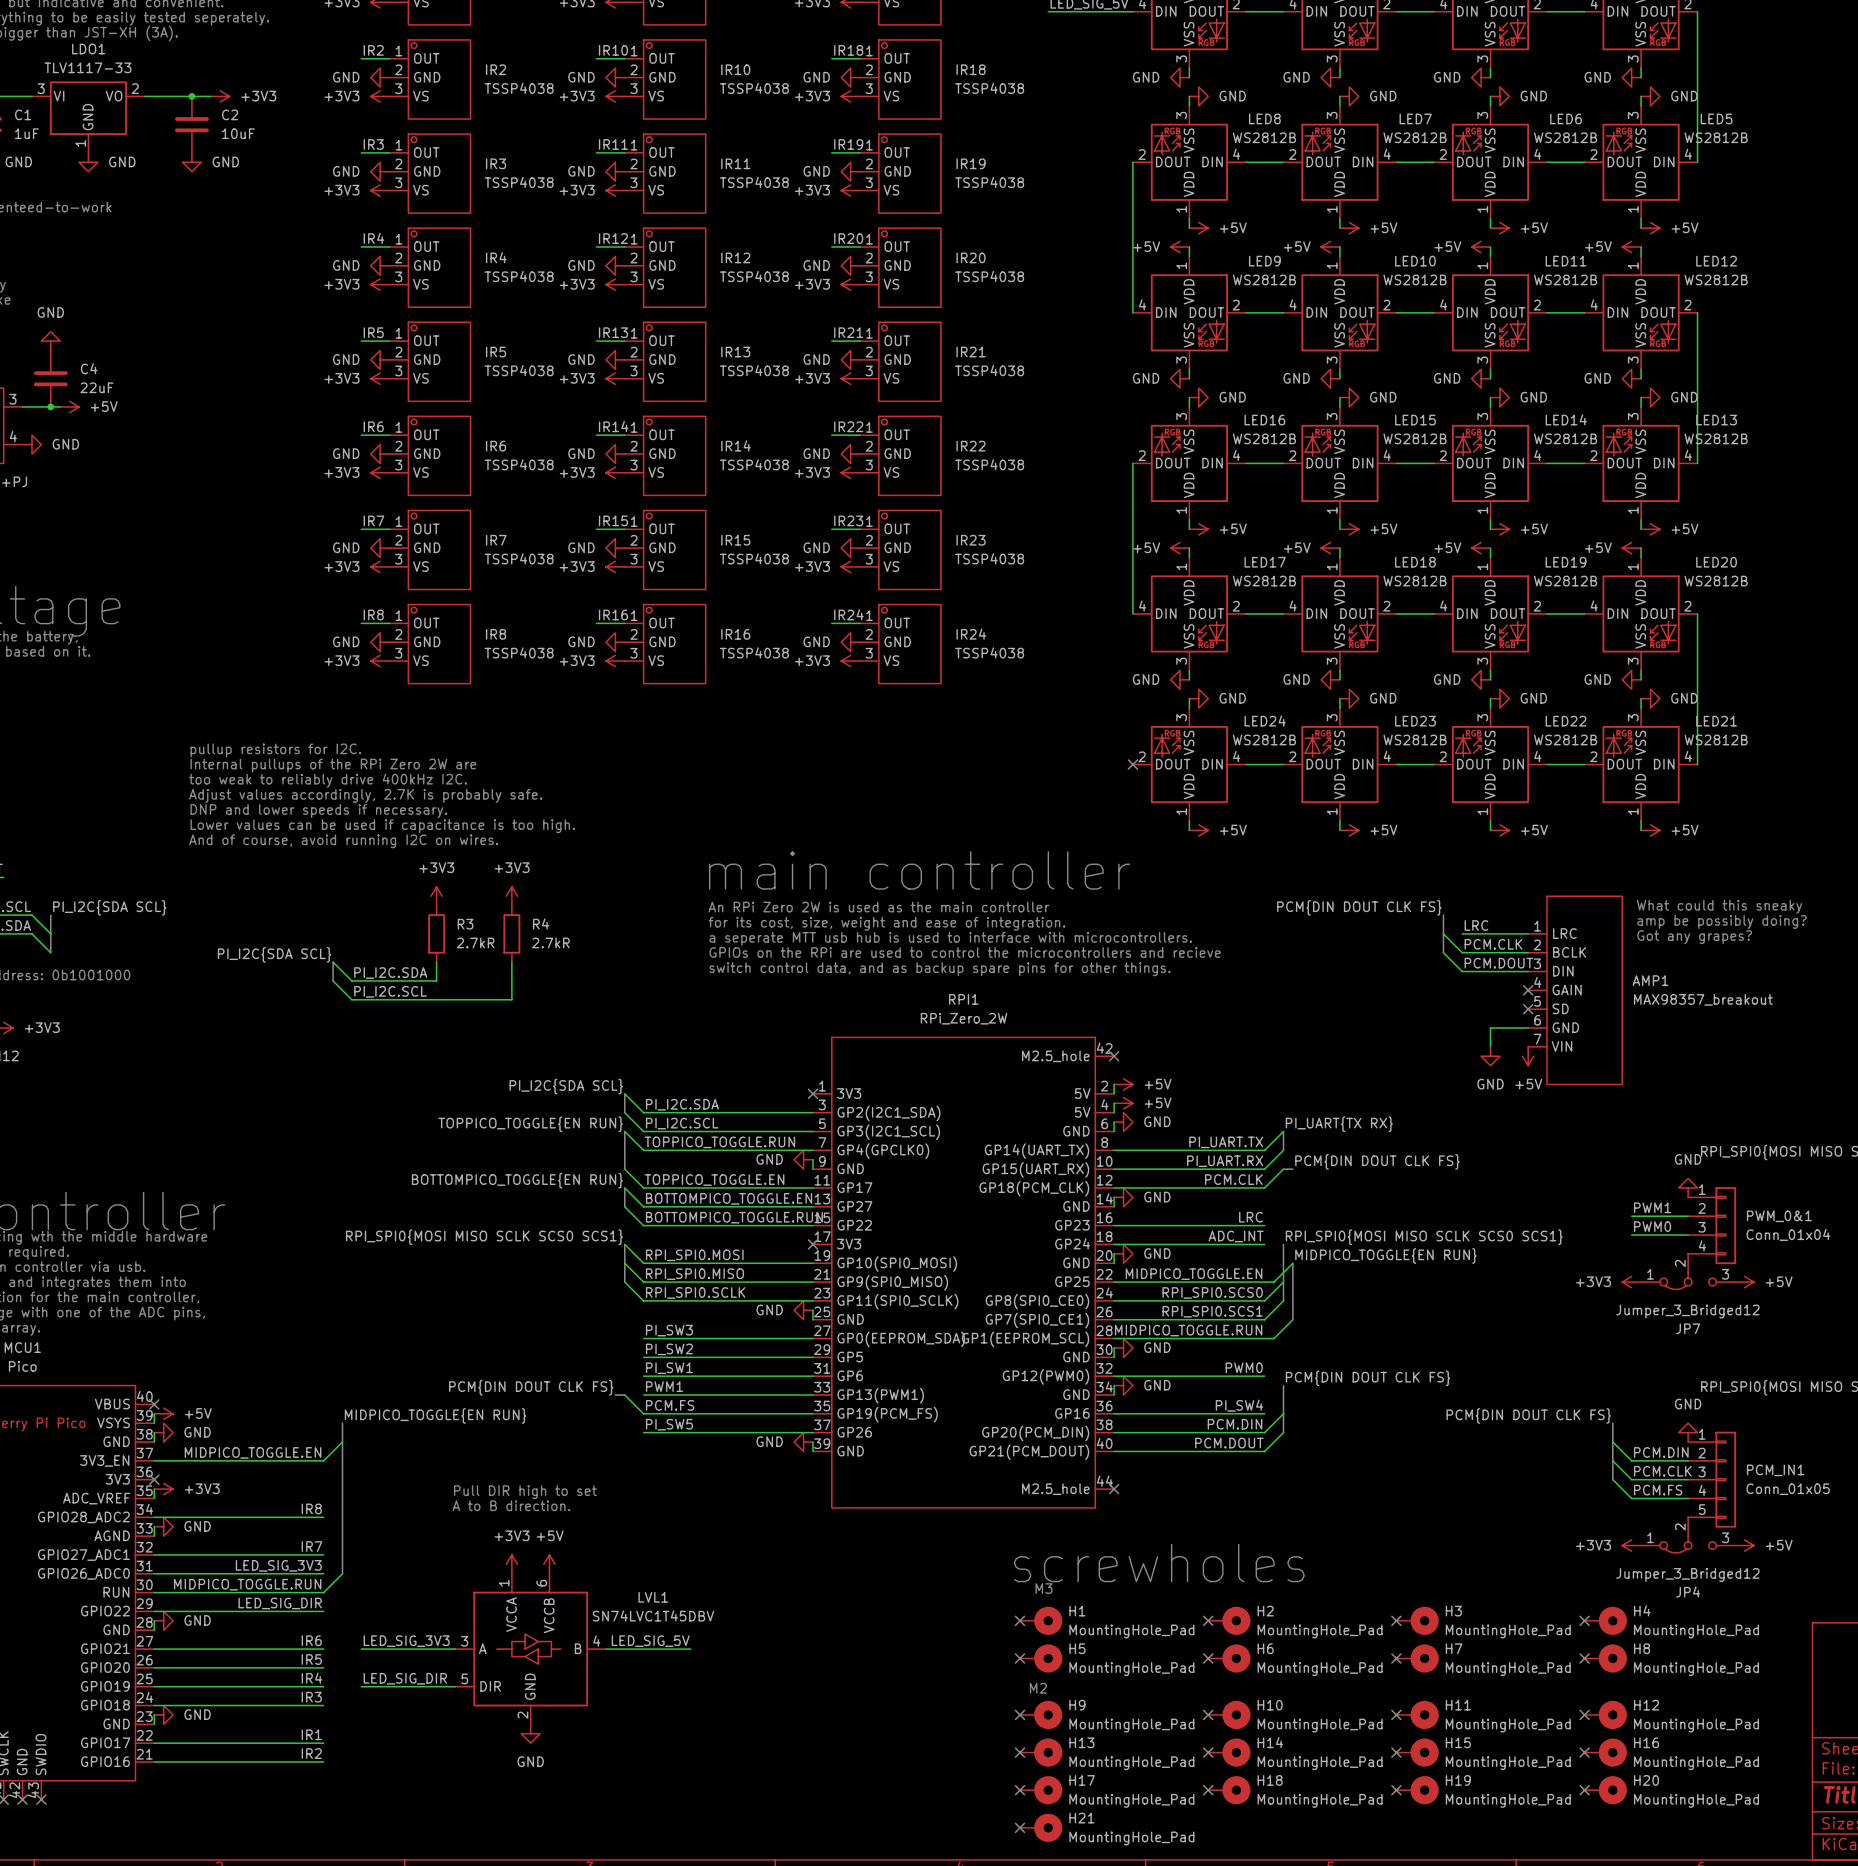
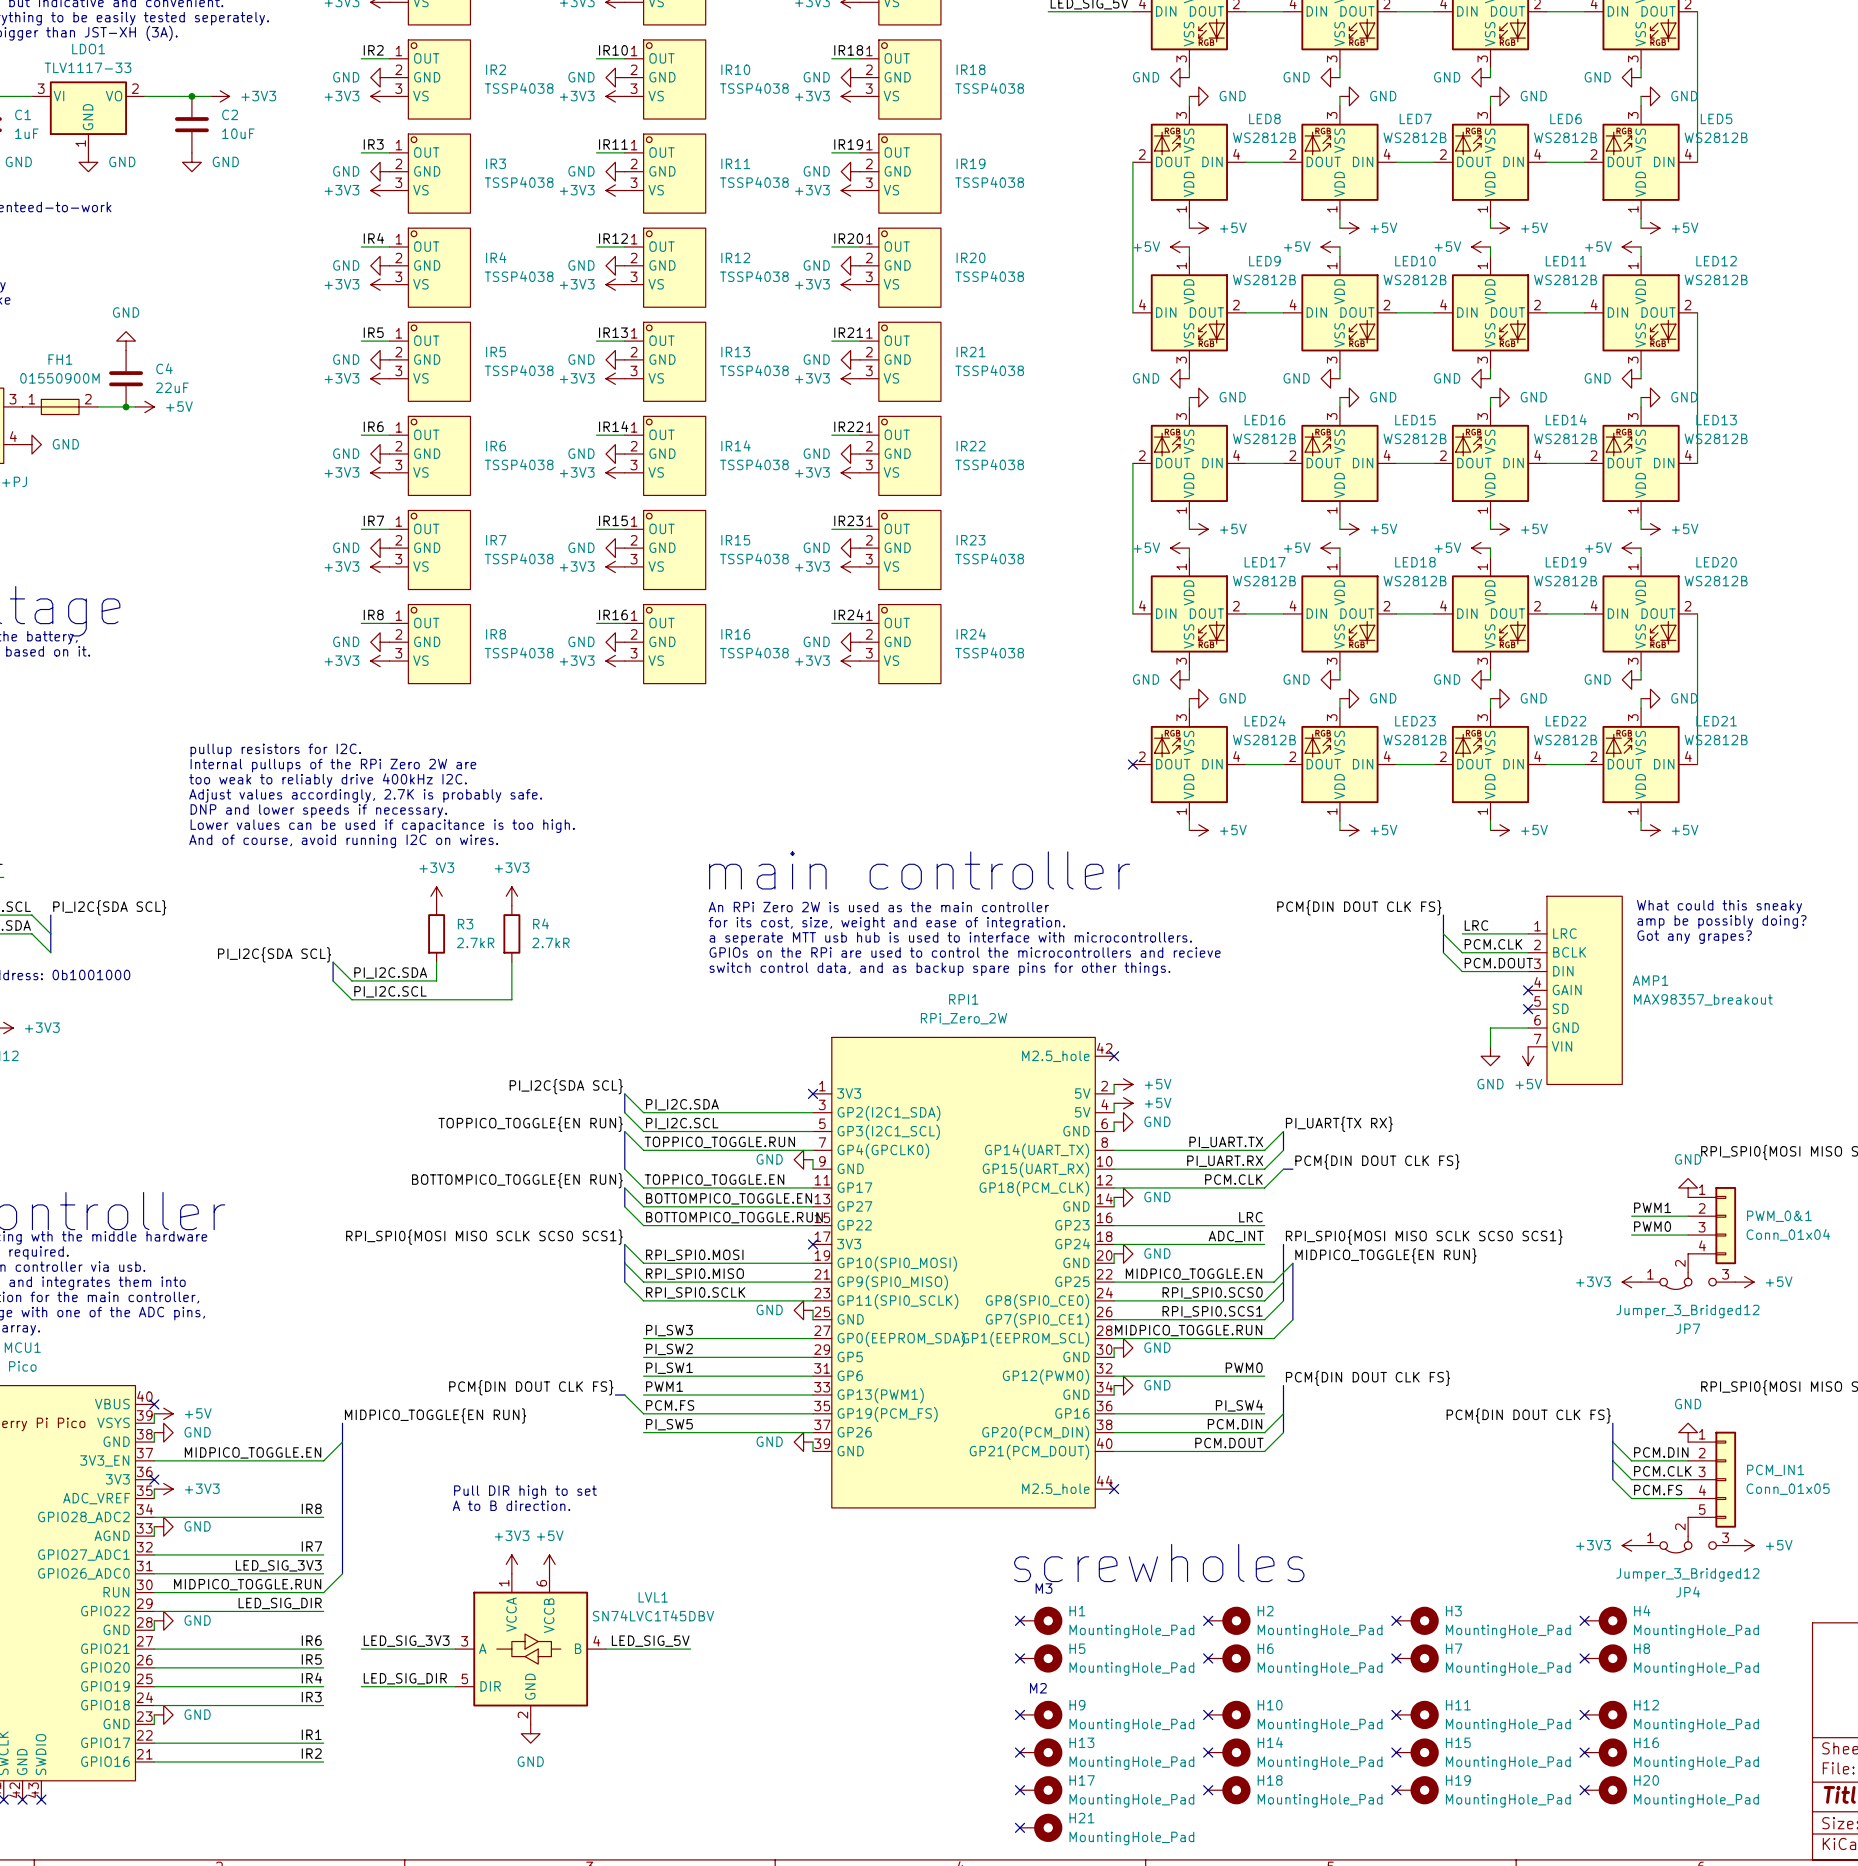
power symbol position: GND (50, 341) -> GND (126, 341)
C4 position: (50, 378) -> (126, 378)
junction: (50, 406) -> none
FH1: none -> 01550900M (60, 406)
power symbol position: +5V (69, 406) -> +5V (144, 406)
junction: none -> (126, 406)

